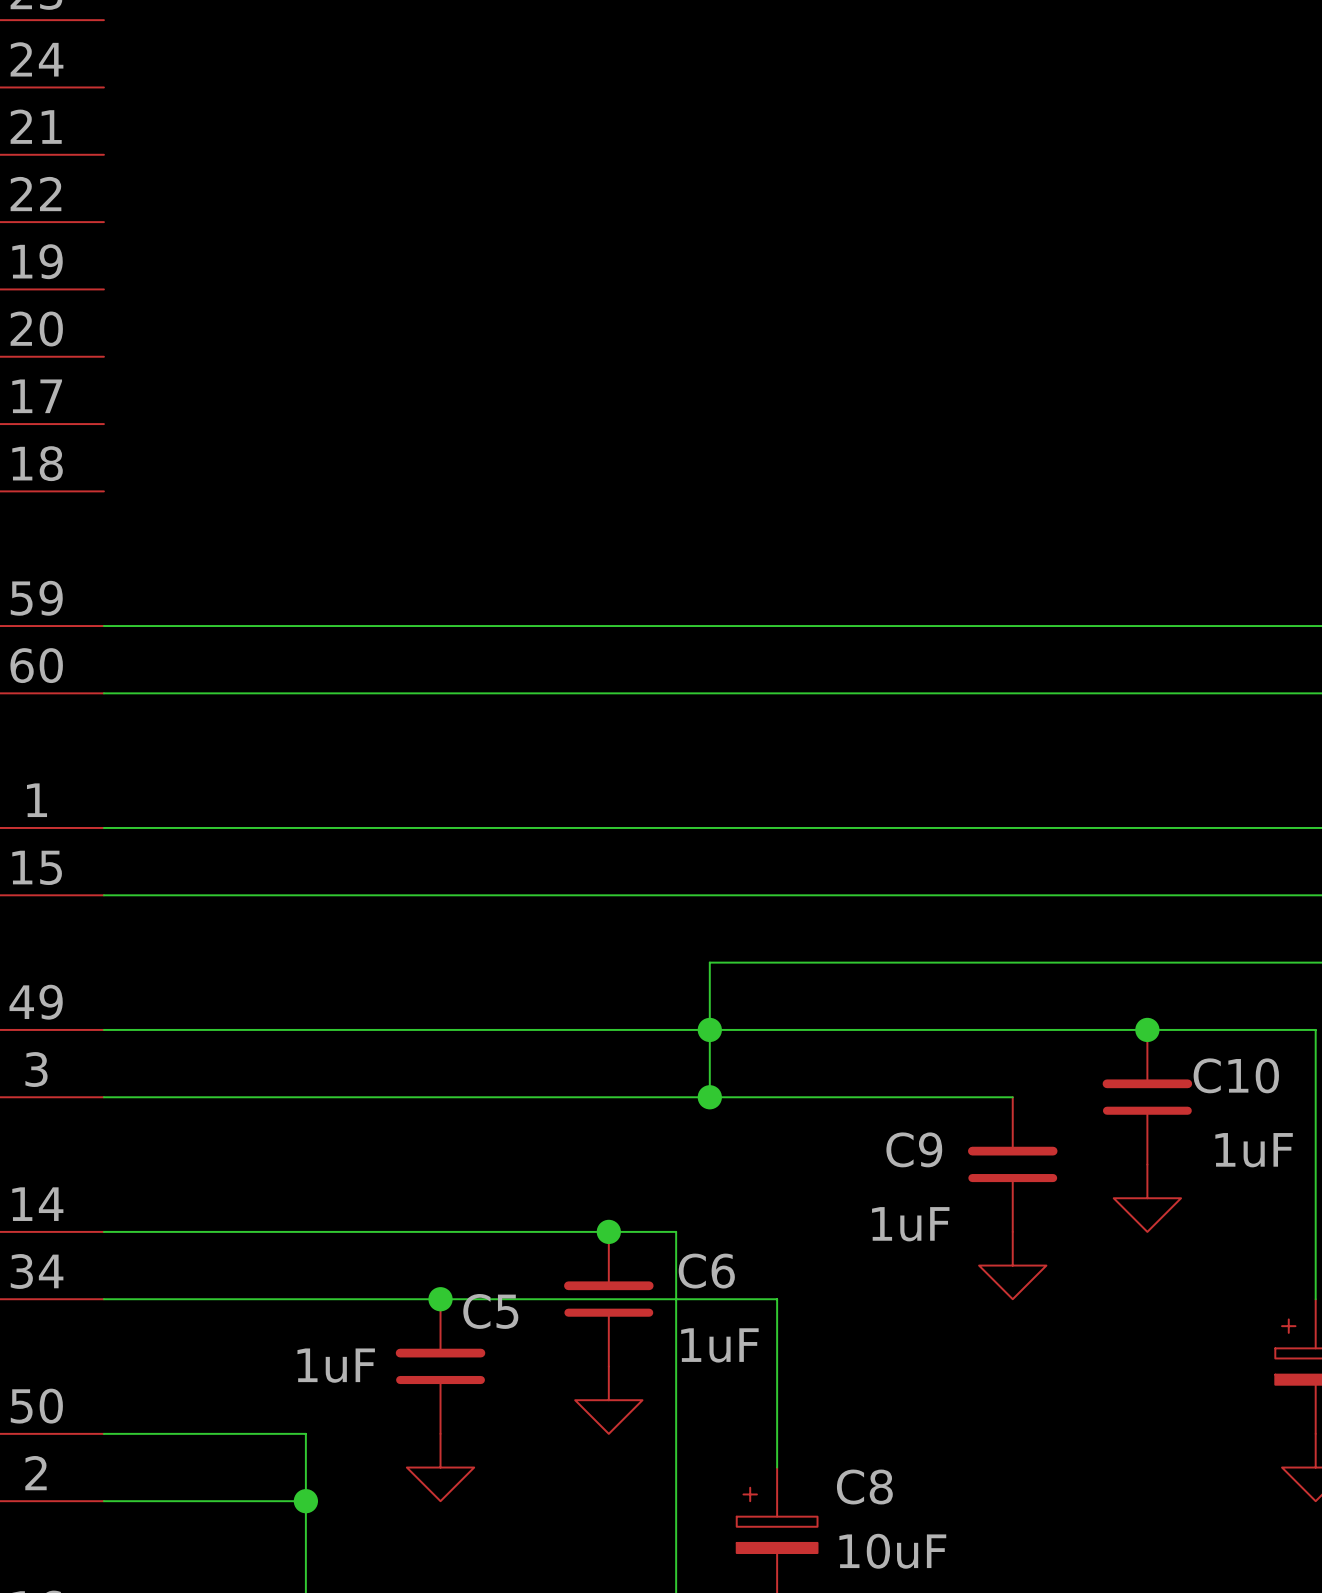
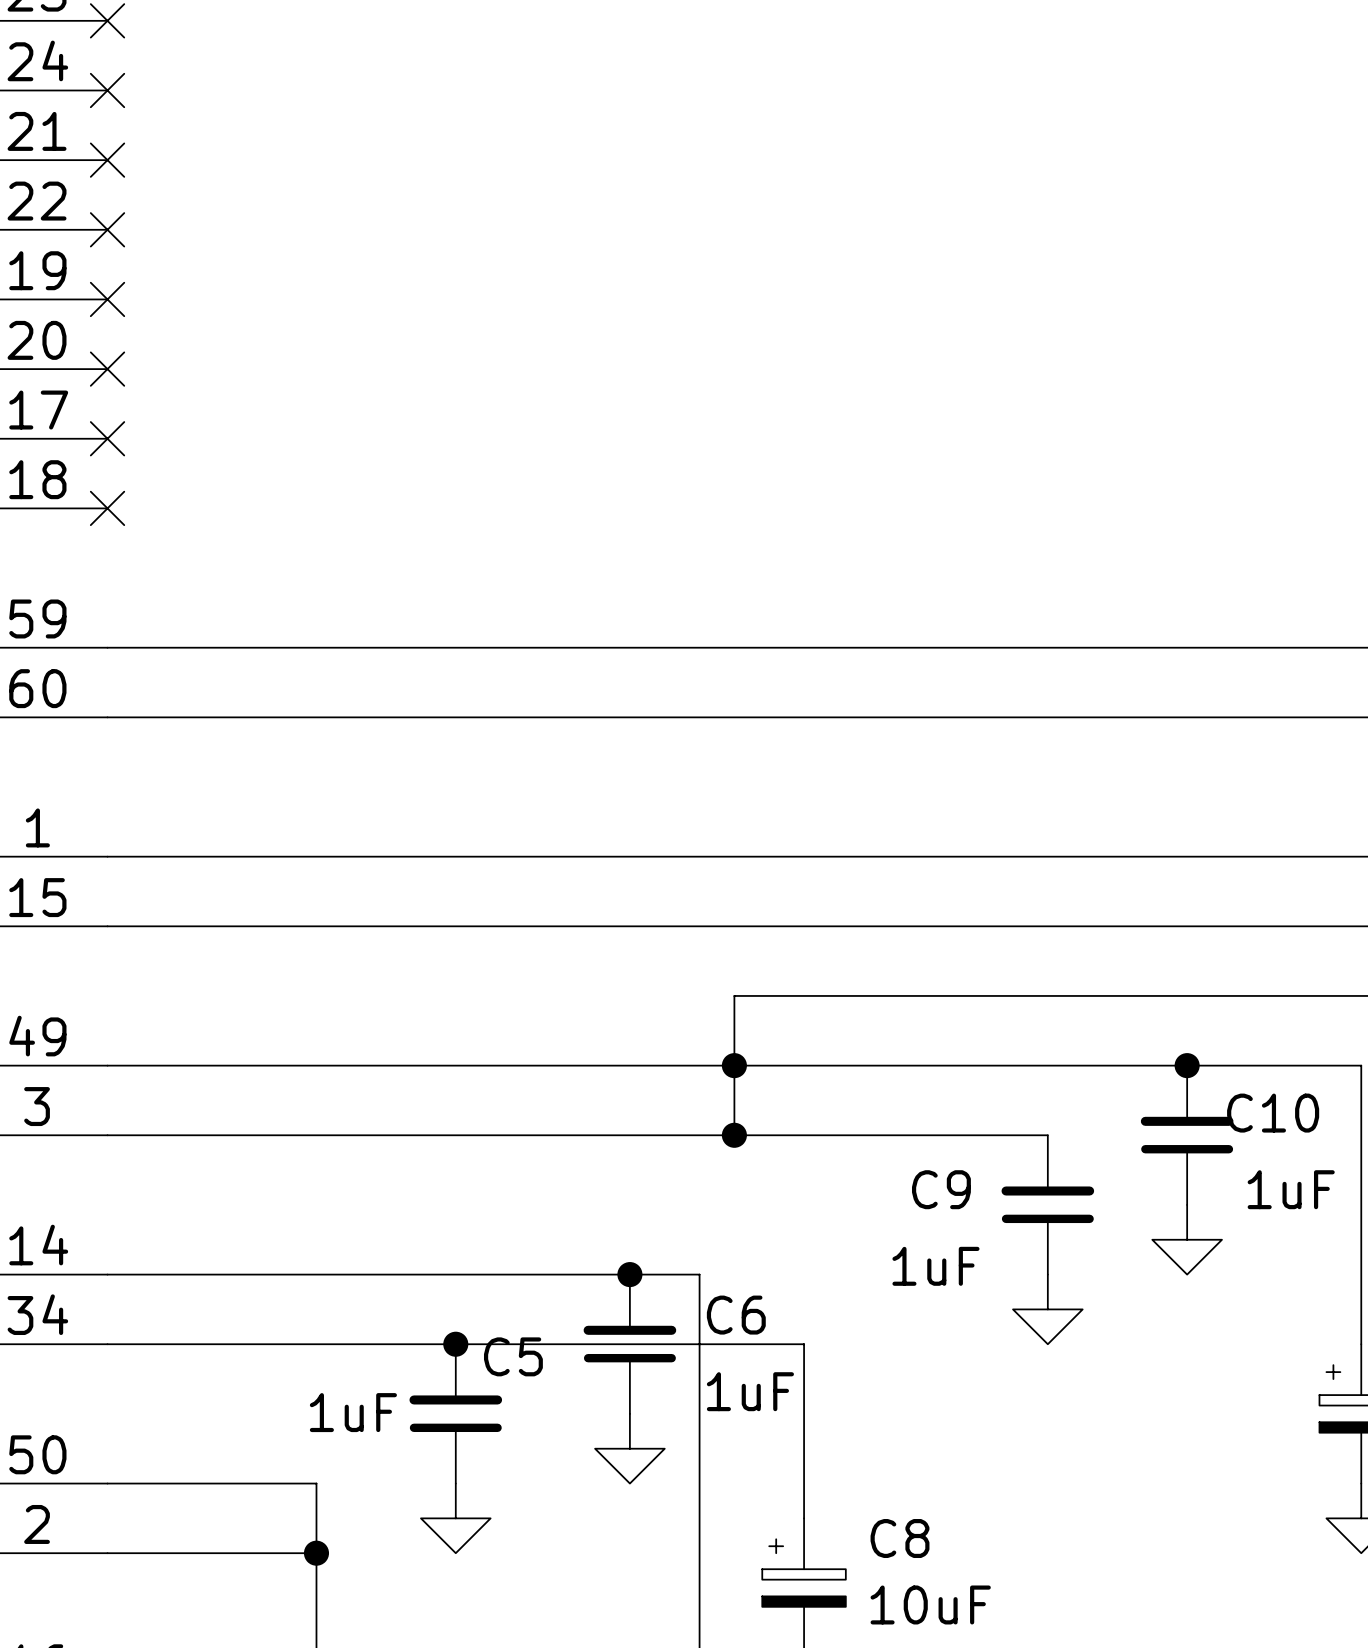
no-connect mark: none -> (107, 20)
no-connect mark: none -> (107, 90)
no-connect mark: none -> (107, 160)
no-connect mark: none -> (107, 229)
no-connect mark: none -> (107, 299)
no-connect mark: none -> (107, 369)
no-connect mark: none -> (107, 438)
no-connect mark: none -> (107, 508)

